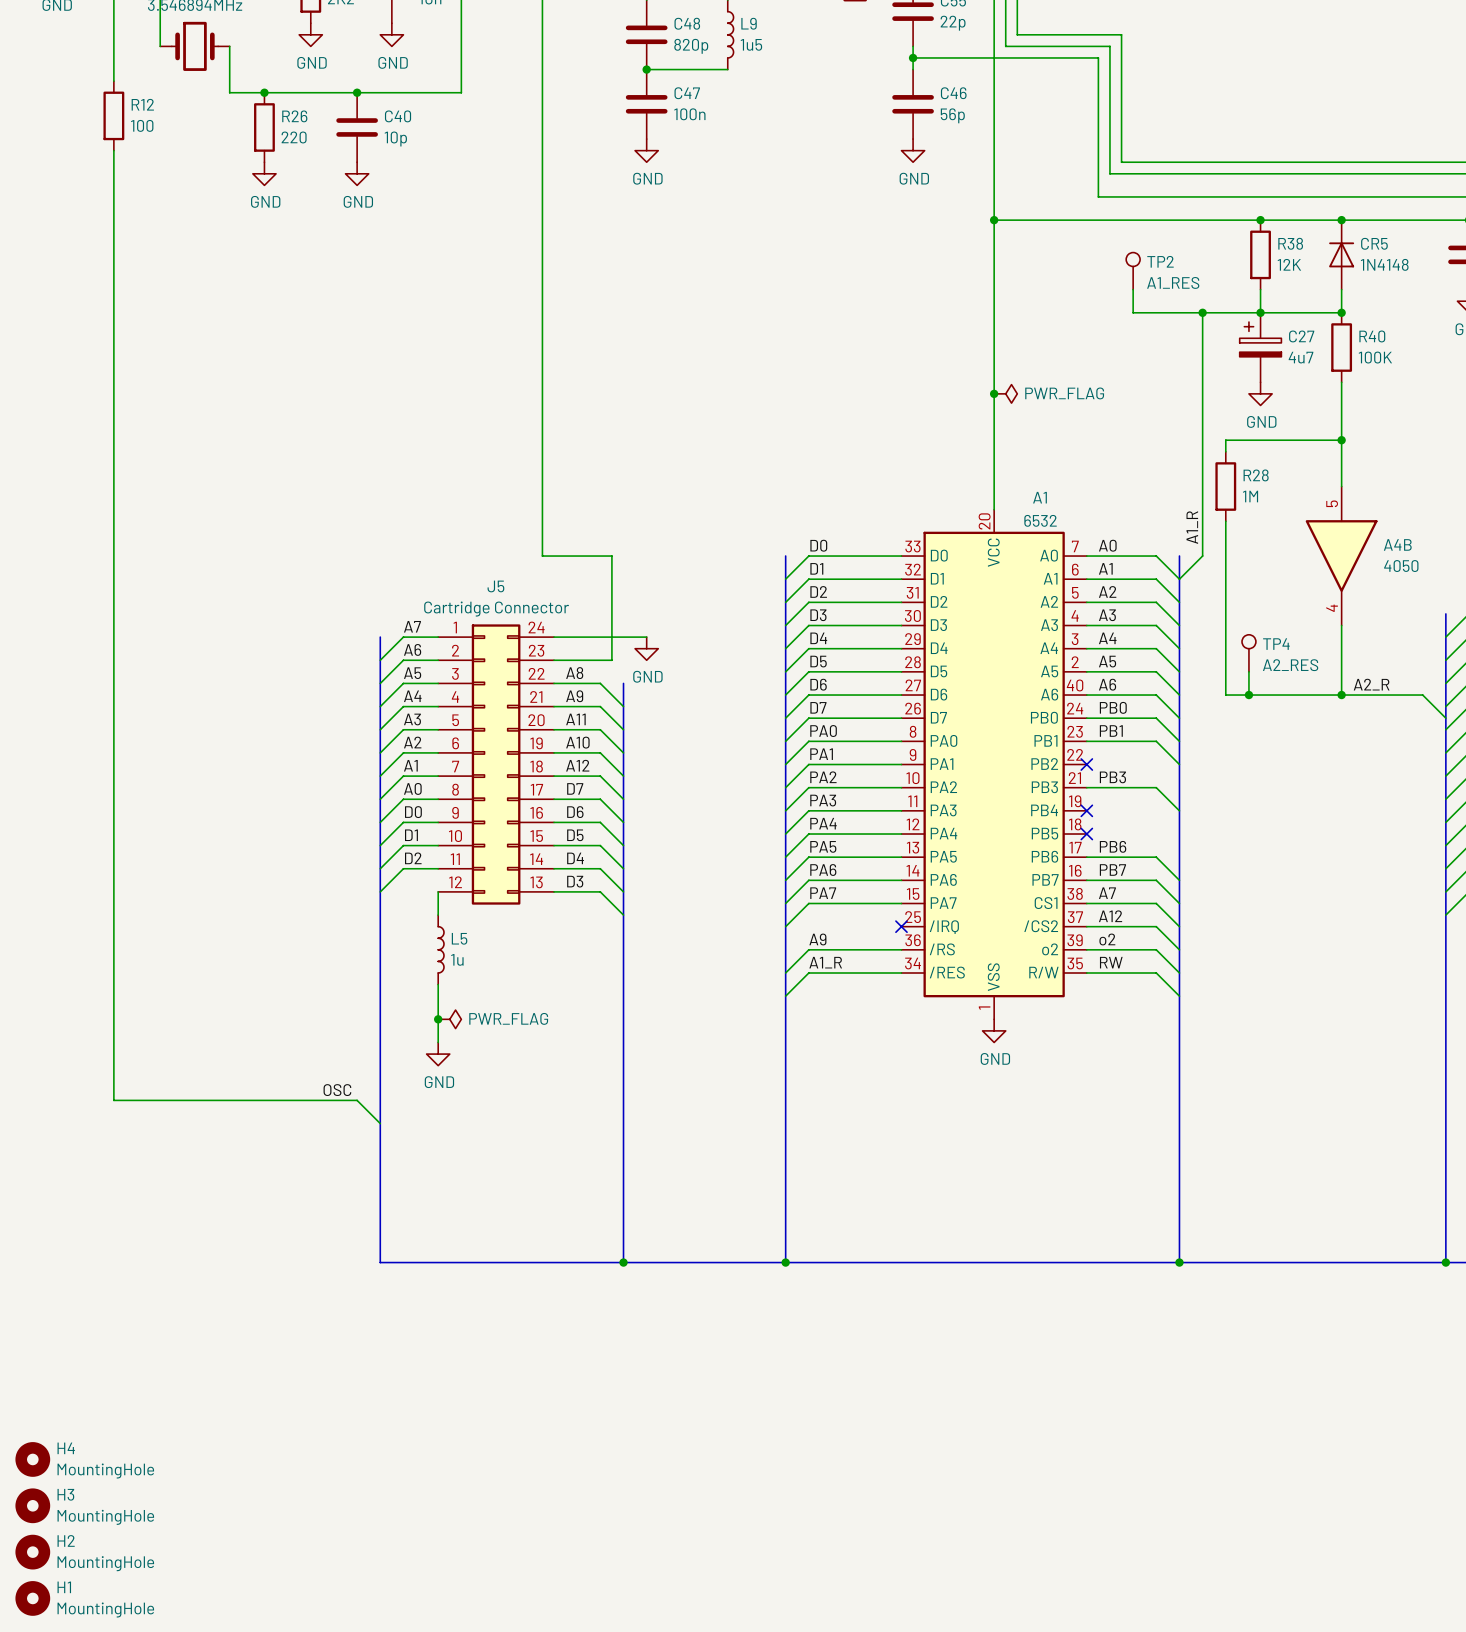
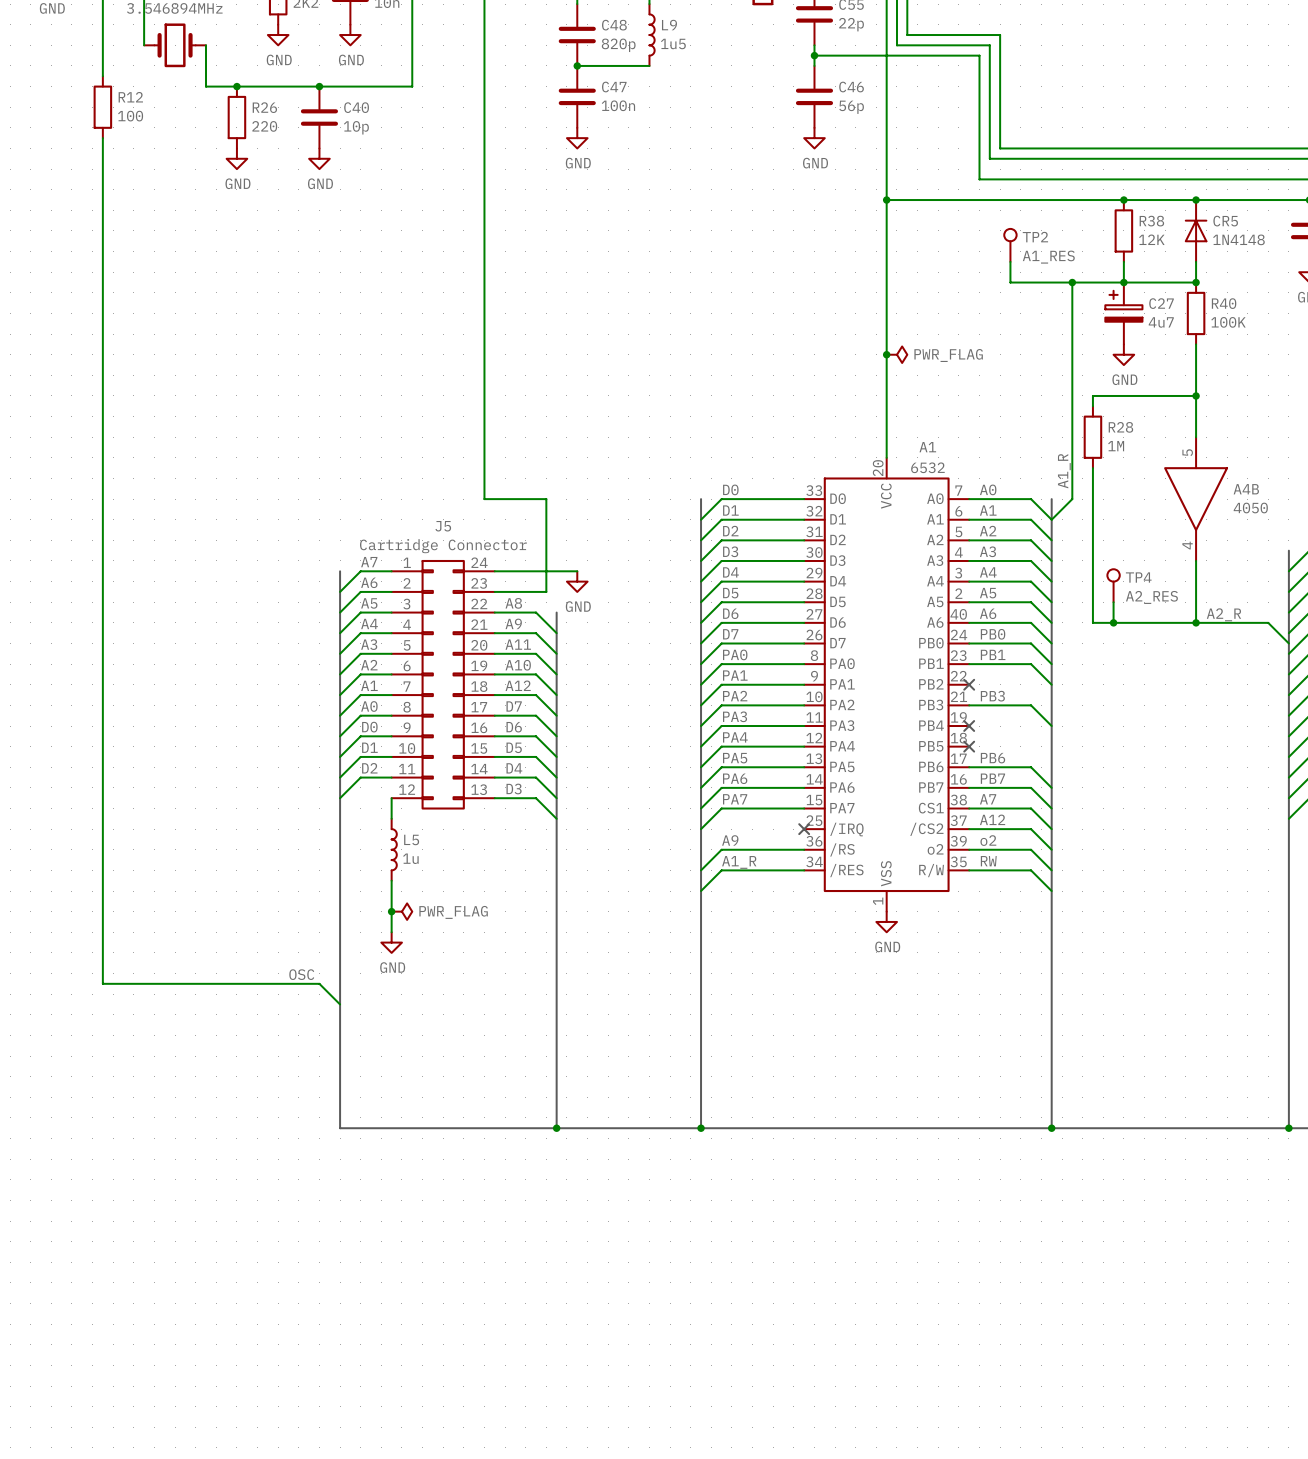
H4: MountingHole (32, 1459) -> none
H3: MountingHole (32, 1505) -> none
H2: MountingHole (32, 1552) -> none
H1: MountingHole (32, 1598) -> none

